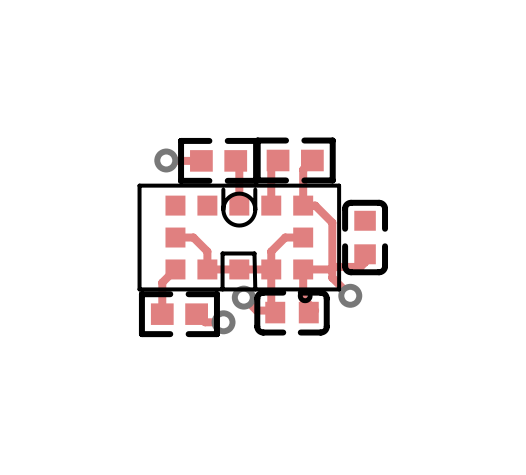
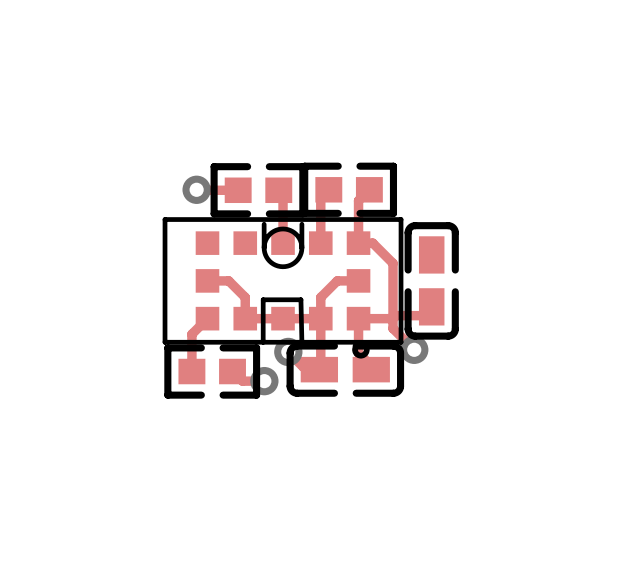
part footprint: [342, 199, 389, 276] -> [404, 222, 459, 340]
part footprint: [254, 289, 330, 336] -> [286, 342, 405, 397]

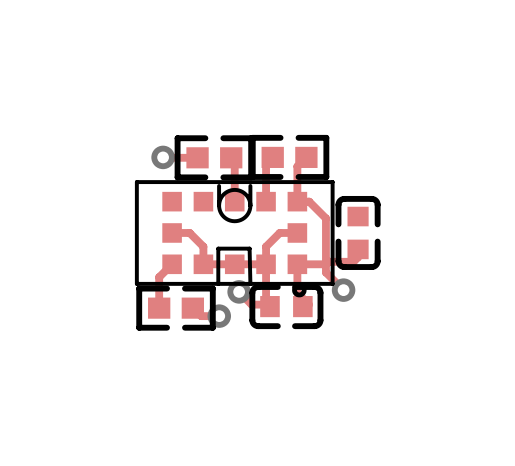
part footprint: [404, 222, 459, 340] -> [335, 195, 381, 270]
part footprint: [286, 342, 405, 397] -> [249, 284, 324, 330]

